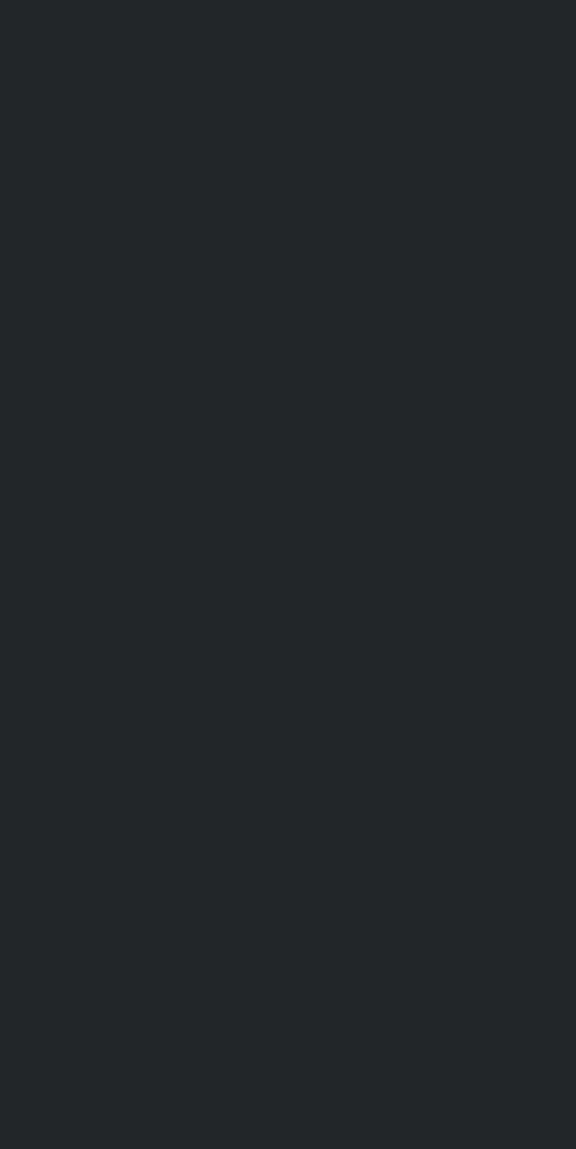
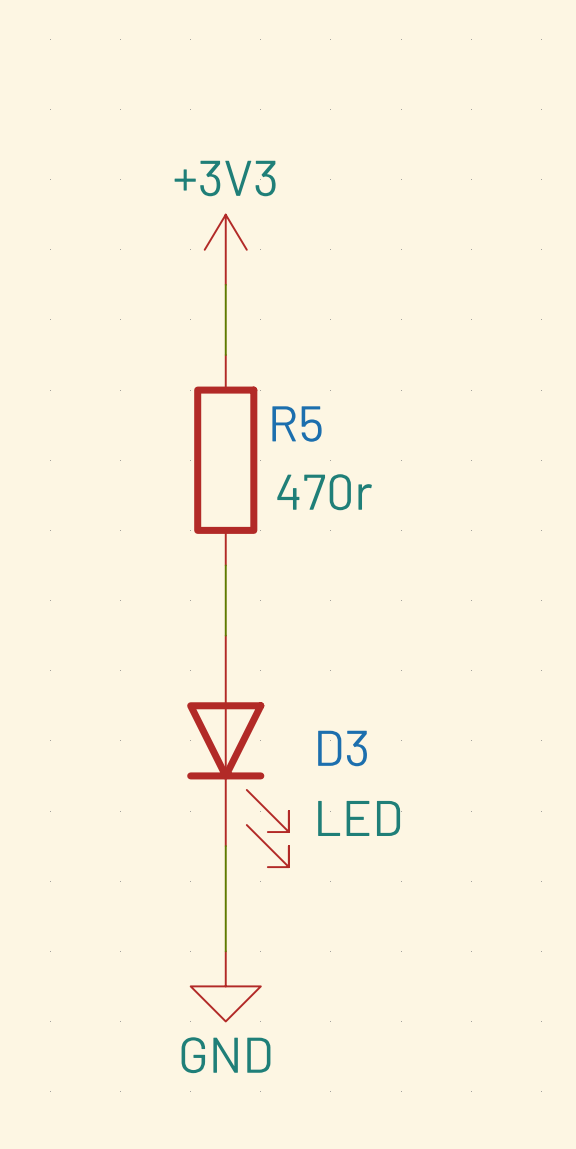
power symbol: none -> +3V3 (225, 249)
wire: none -> (225, 284) (225, 355)
R5: none -> 470r (225, 460)
wire: none -> (225, 565) (225, 635)
D3: none -> LED (238, 751)
wire: none -> (225, 846) (225, 951)
power symbol: none -> GND (225, 986)

